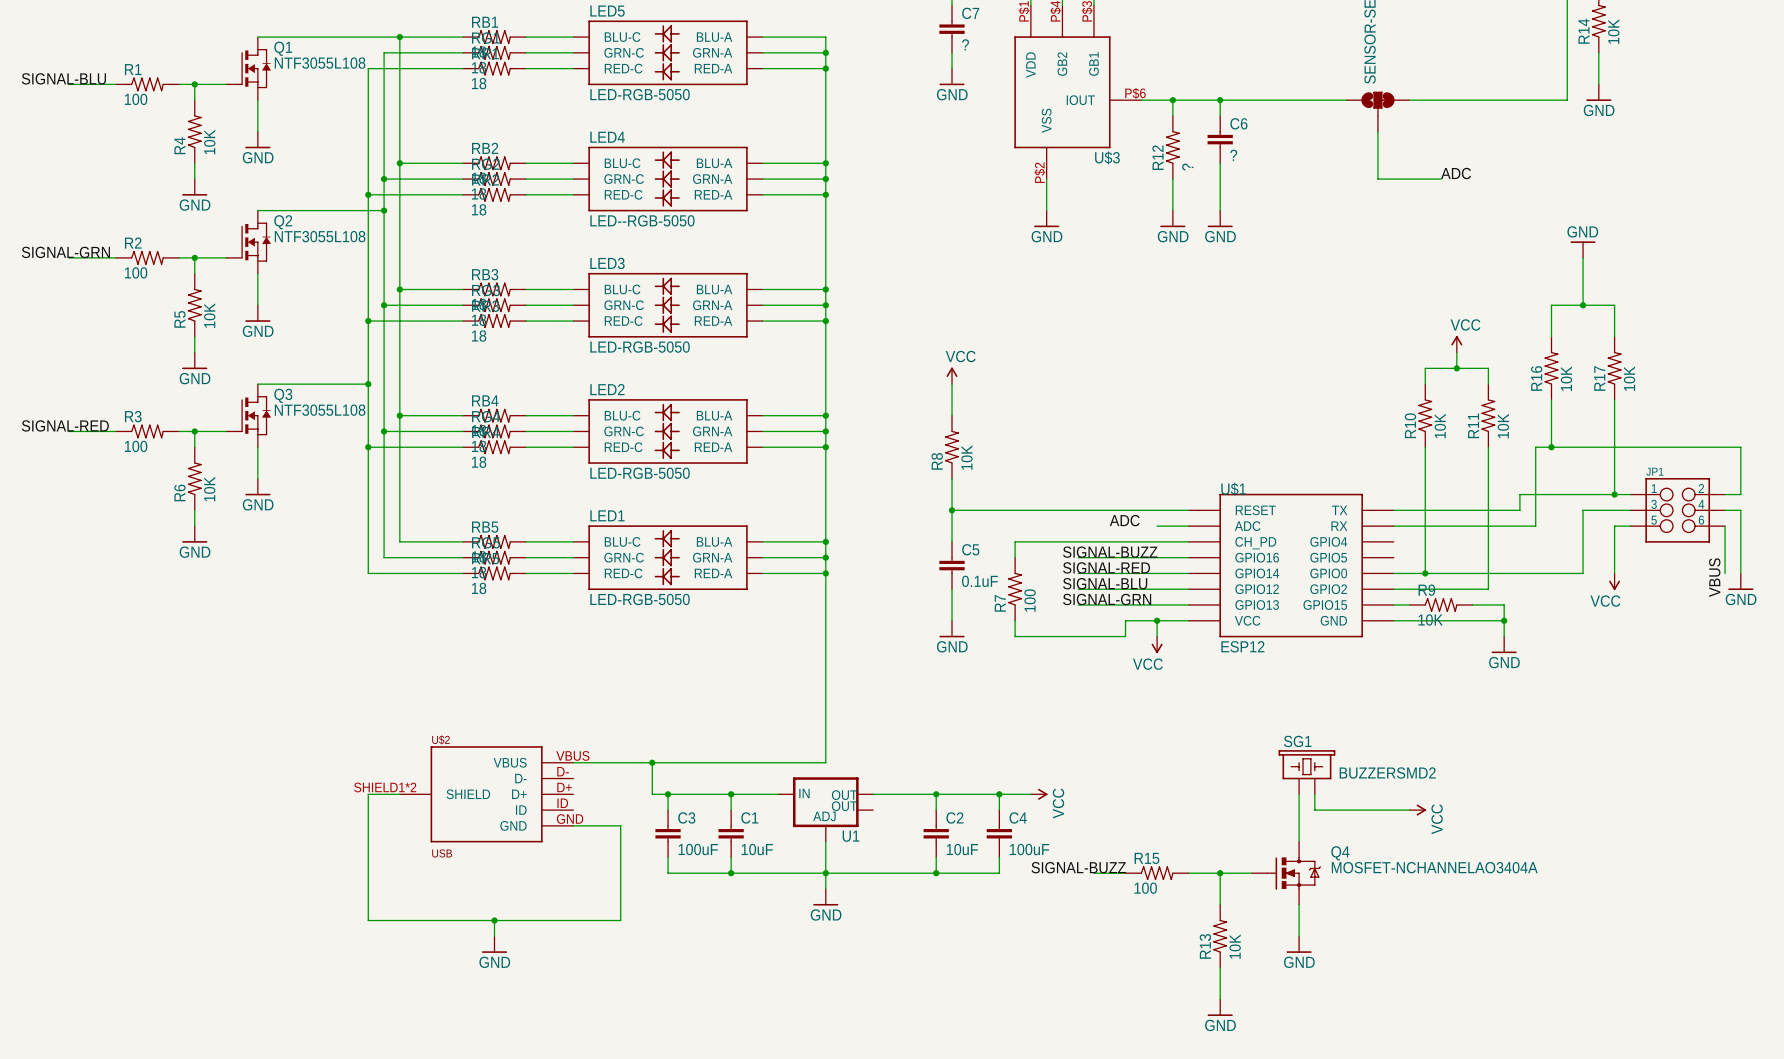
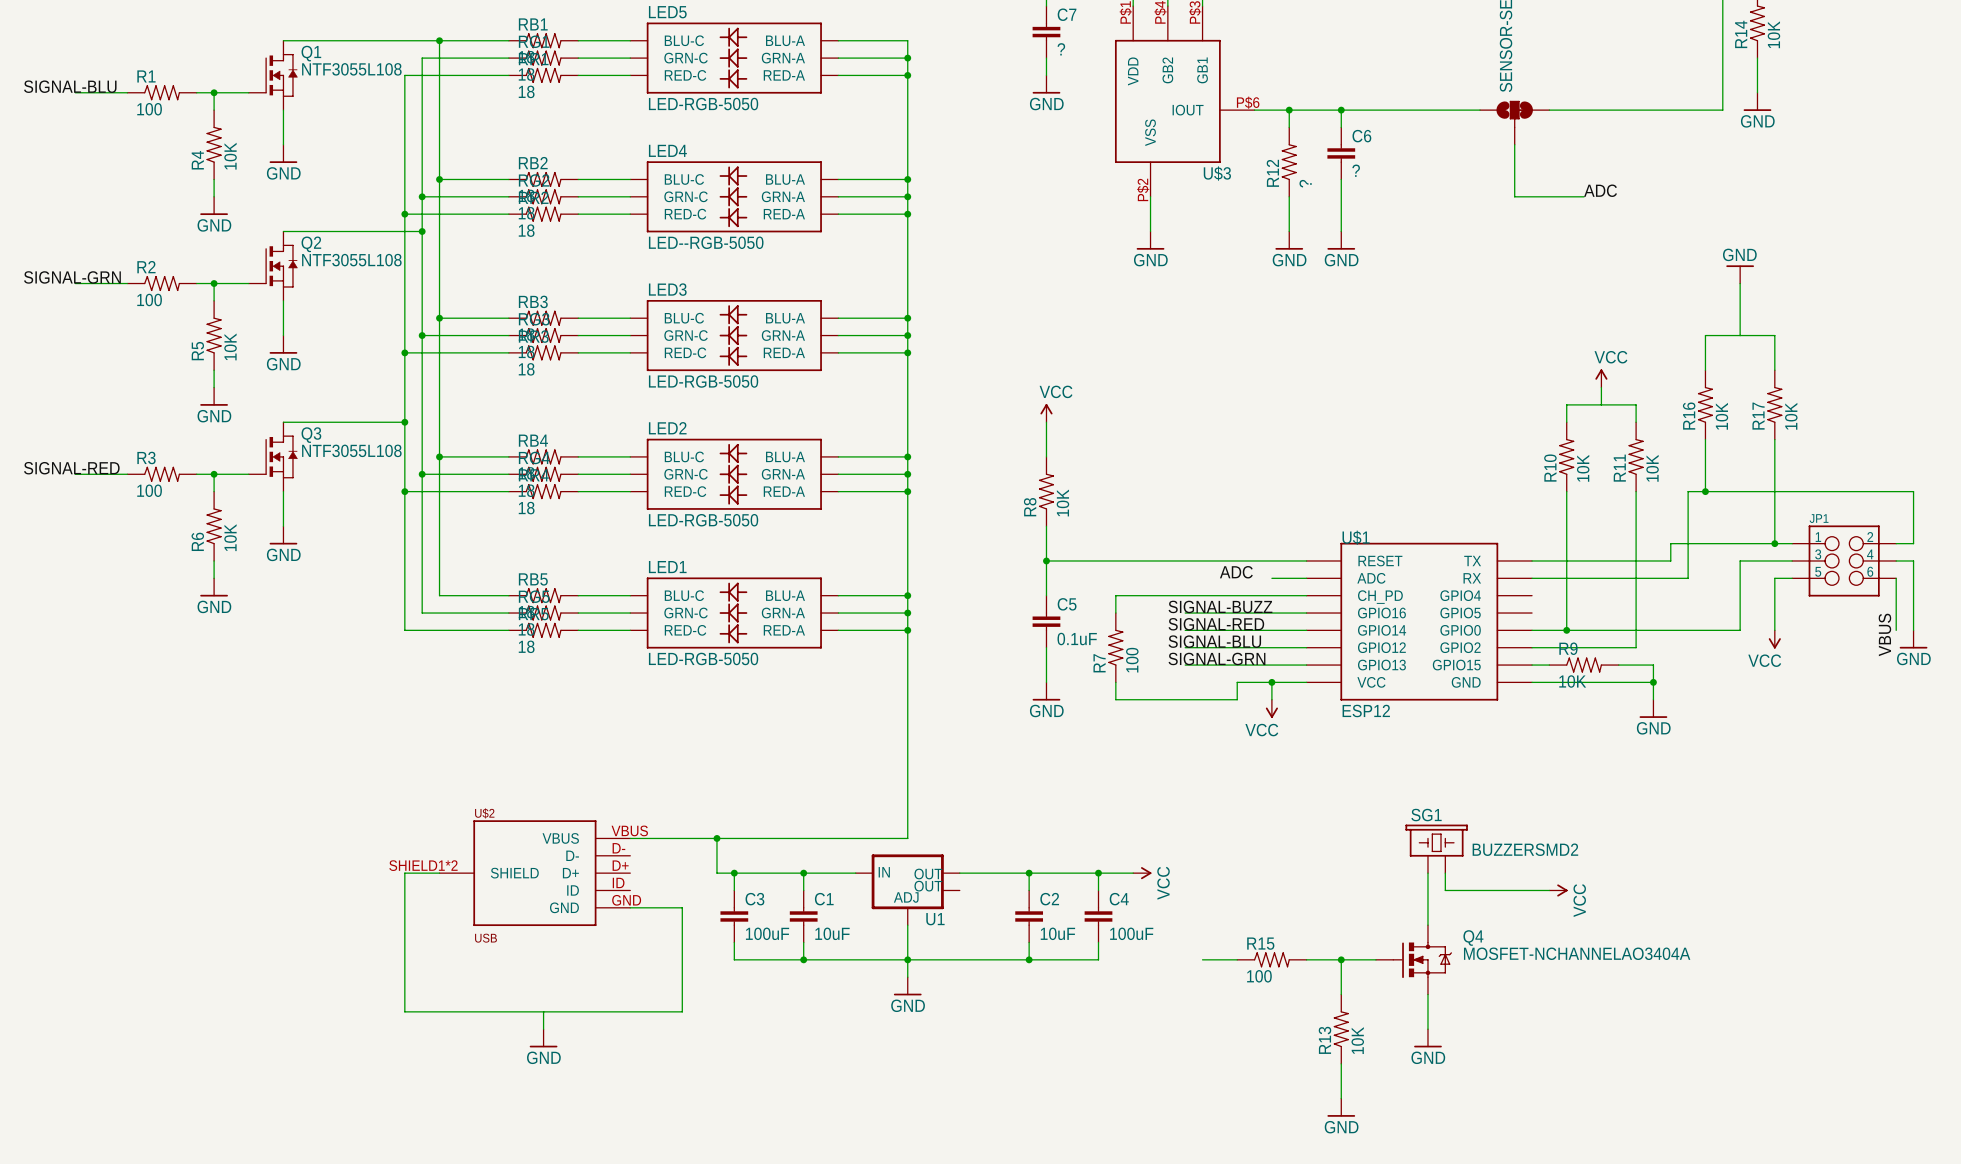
junction: (1583, 305) -> none
junction: (1456, 368) -> none
label: SIGNAL-BUZZ (1078, 867) -> none
junction: (494, 920) -> none

